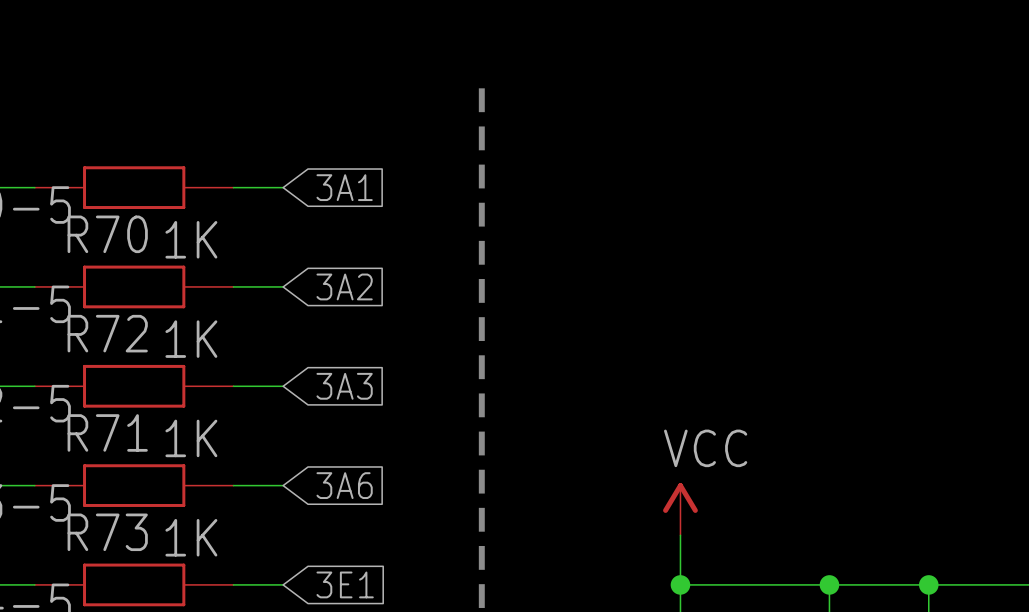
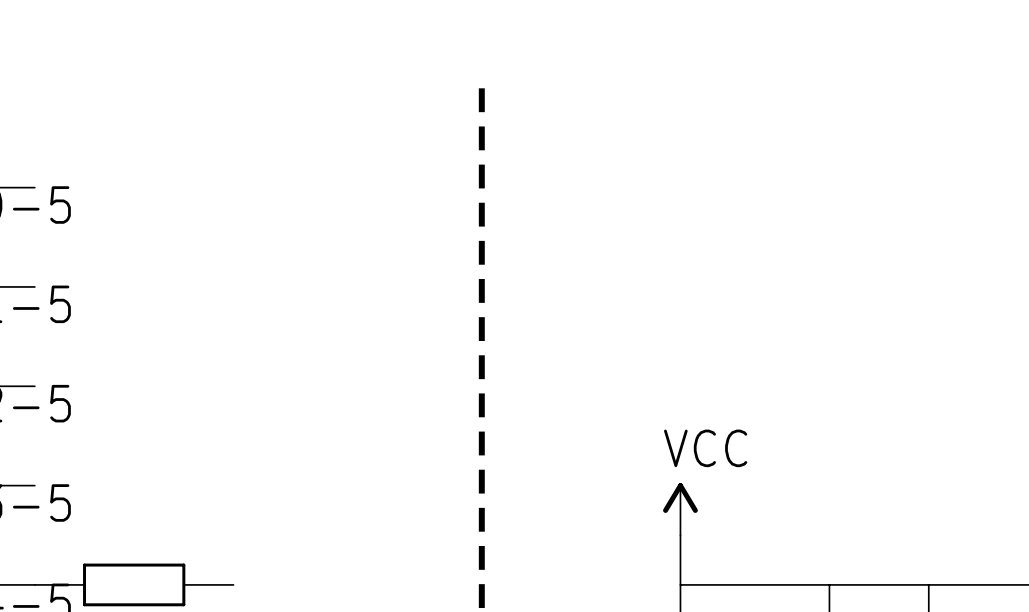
R70: 1K (134, 187) -> none
wire: (233, 187) (283, 187) -> none
global label: 3A1 (344, 187) -> none
R72: 1K (134, 286) -> none
wire: (233, 286) (283, 286) -> none
global label: 3A2 (344, 286) -> none
R71: 1K (134, 386) -> none
wire: (233, 386) (283, 386) -> none
global label: 3A3 (344, 386) -> none
R73: 1K (134, 485) -> none
wire: (233, 485) (283, 485) -> none
global label: 3A6 (344, 485) -> none
wire: (233, 584) (283, 584) -> none
global label: 3E1 (345, 584) -> none
junction: (680, 584) -> none
junction: (829, 584) -> none
junction: (928, 584) -> none

